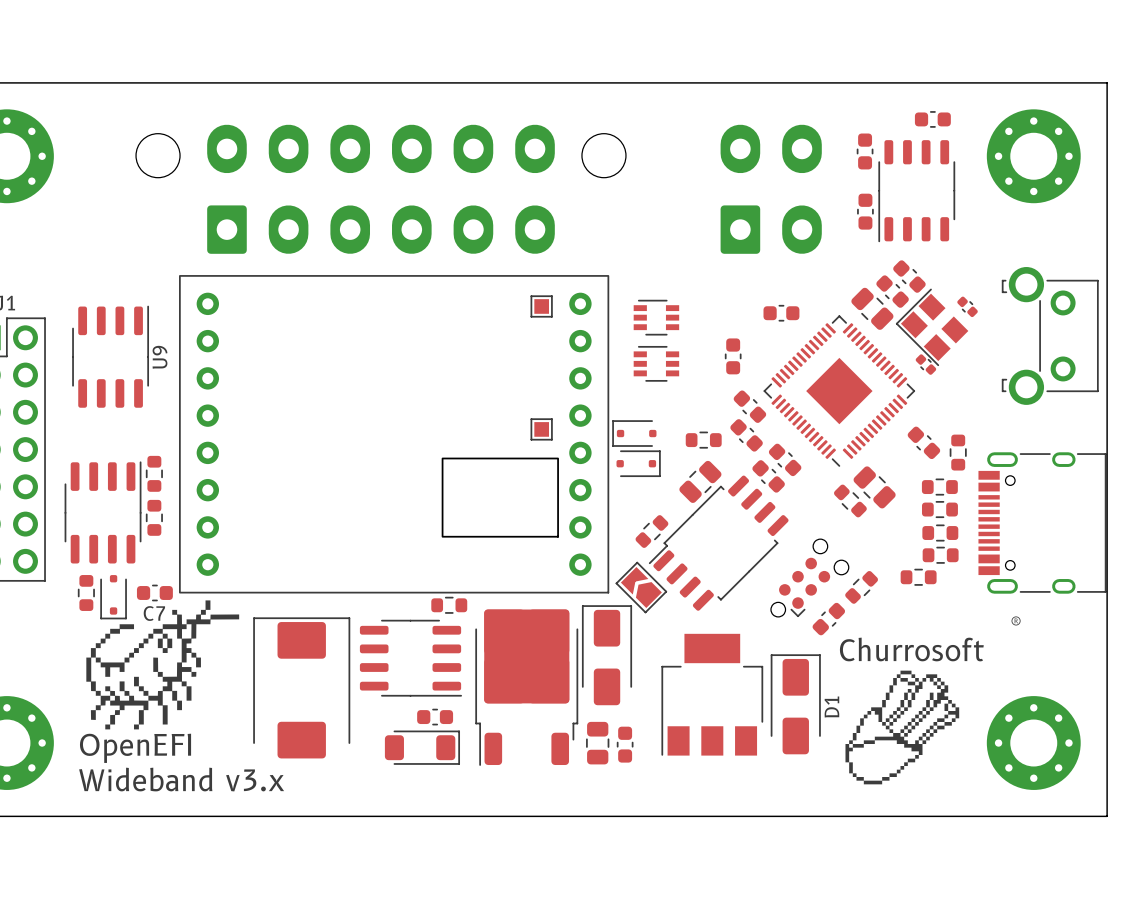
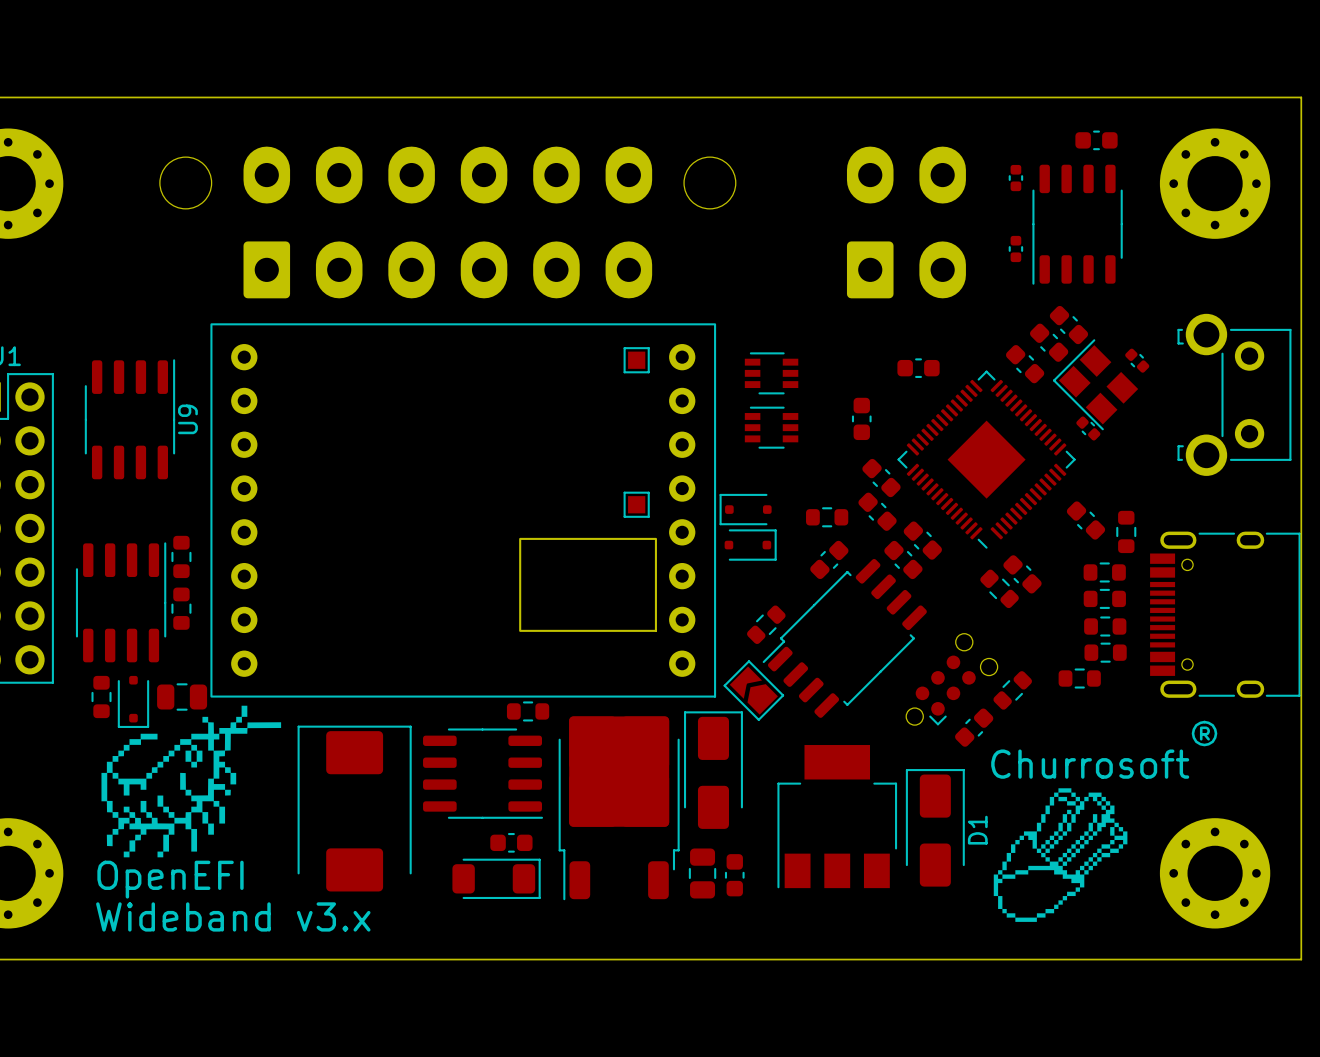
part footprint: [856, 133, 874, 170] -> [1008, 164, 1024, 192]
part footprint: [857, 193, 874, 230] -> [1008, 235, 1024, 263]
part footprint: [851, 287, 894, 330] -> [1006, 345, 1045, 384]
part footprint: [679, 460, 722, 503] -> [810, 540, 849, 580]
part footprint: [853, 466, 896, 509] -> [1003, 555, 1042, 594]
C7: (154, 592) -> none
part: none -> (182, 697)

